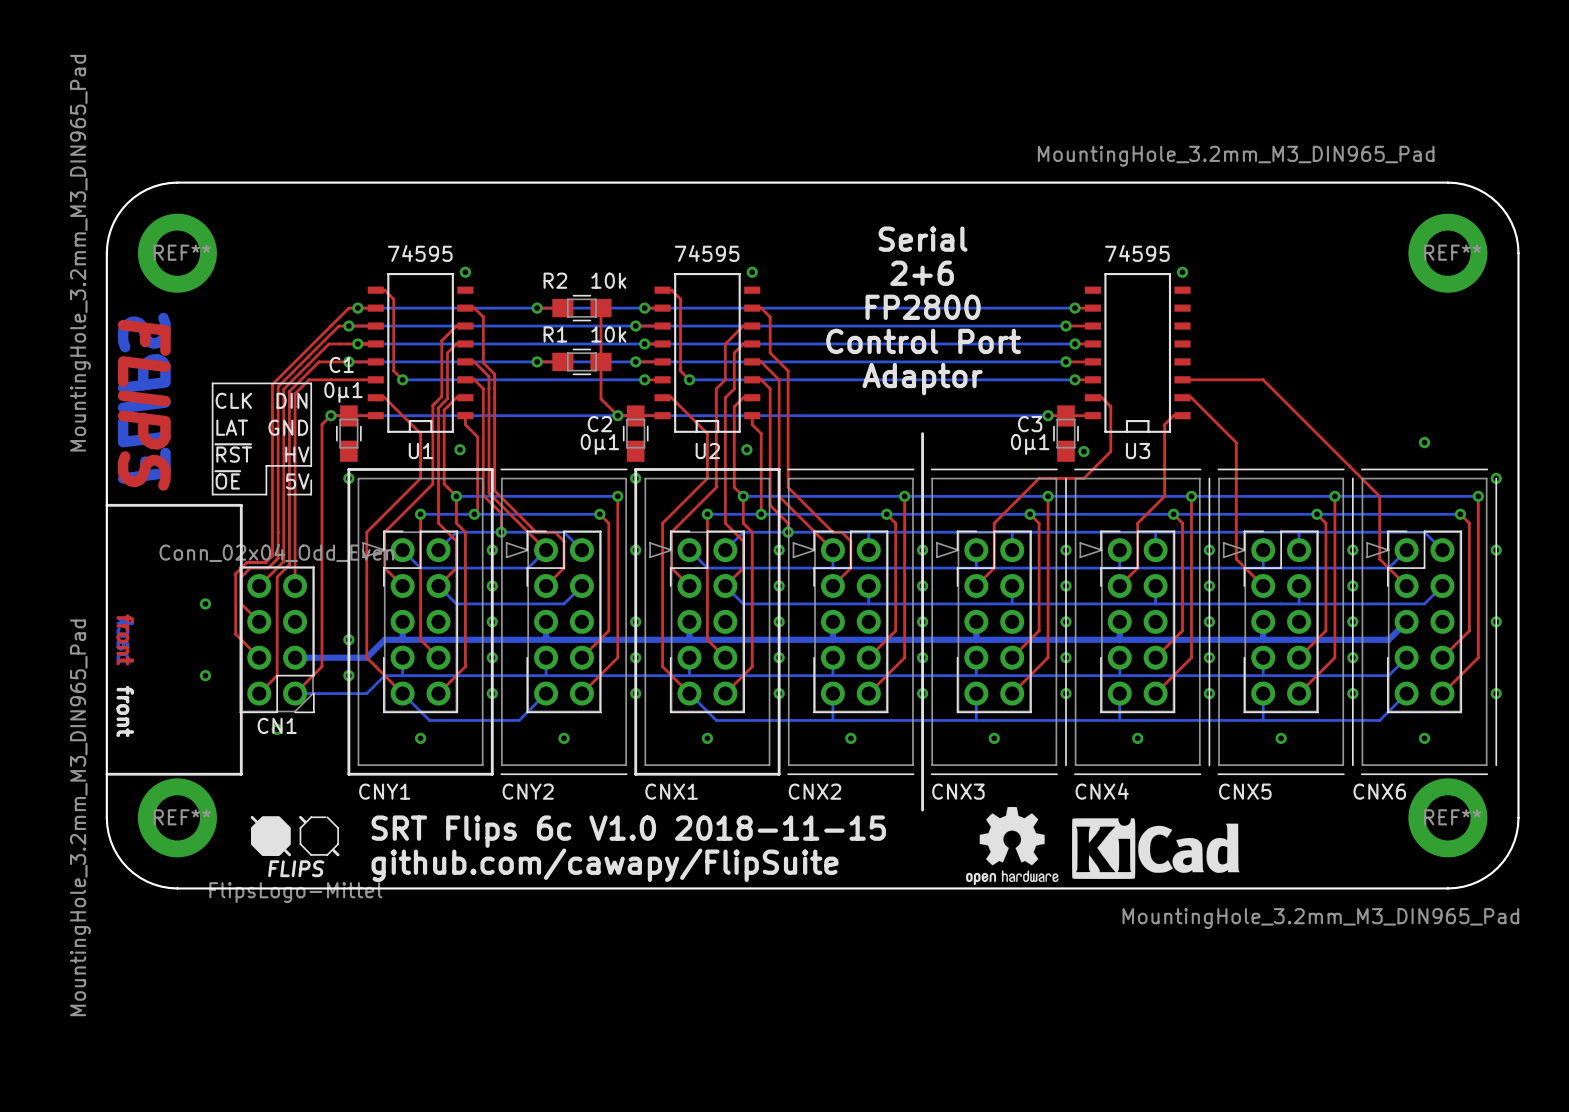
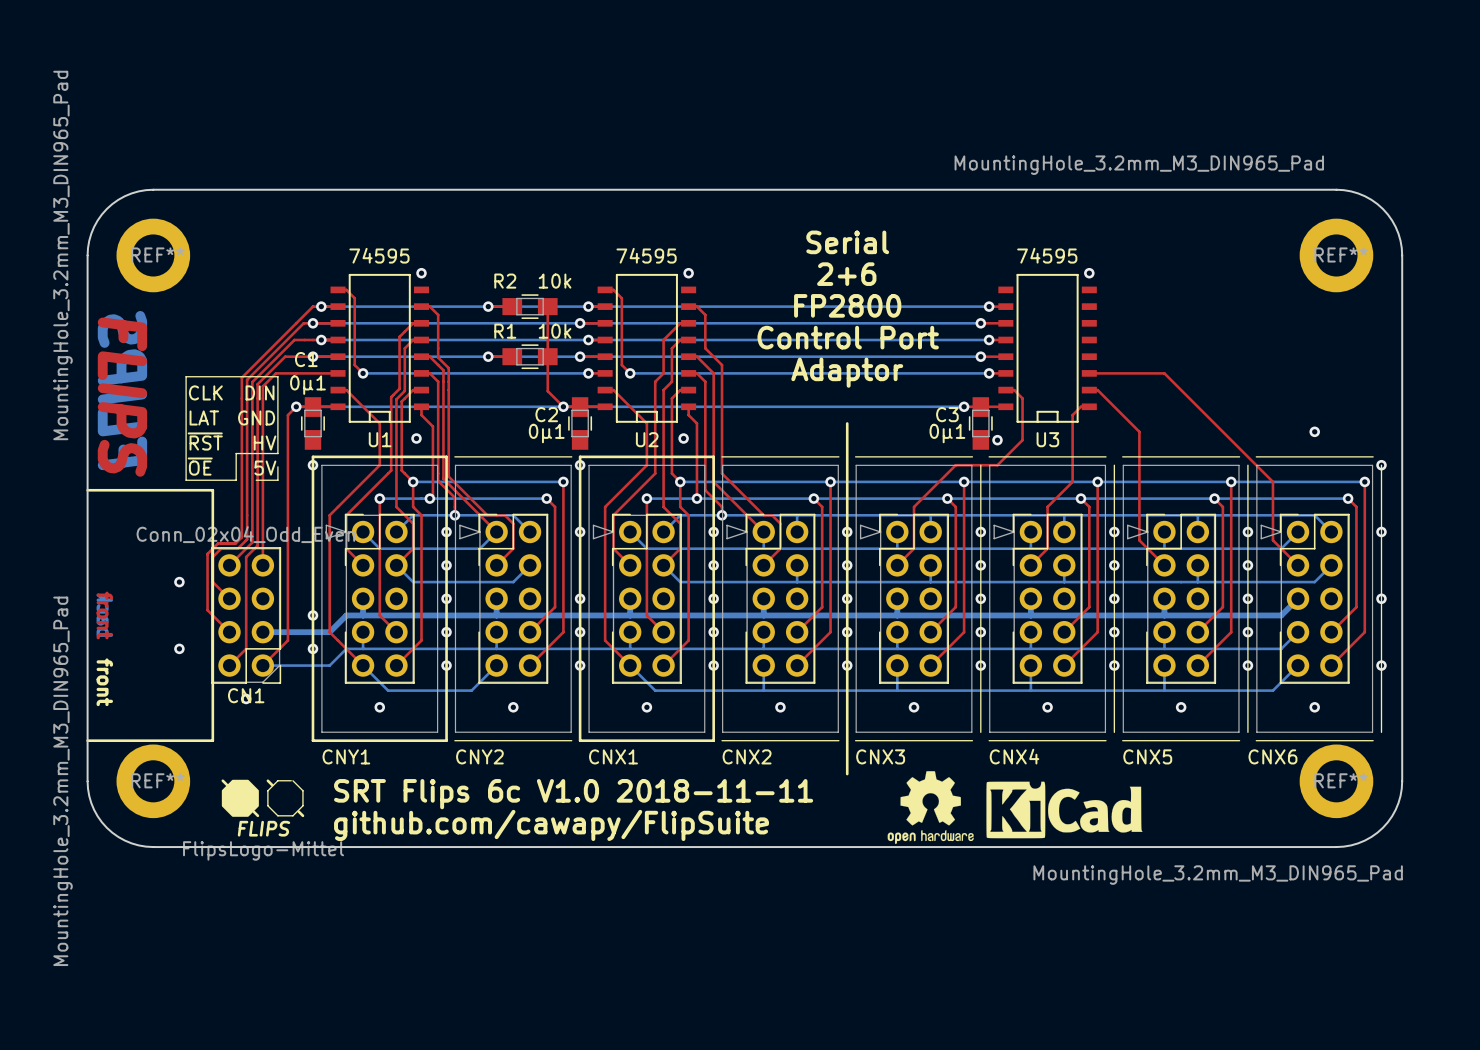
text: SRT Flips 6c V1.0 2018-11-15 (628, 831) -> SRT Flips 6c V1.0 2018-11-11 (573, 794)

